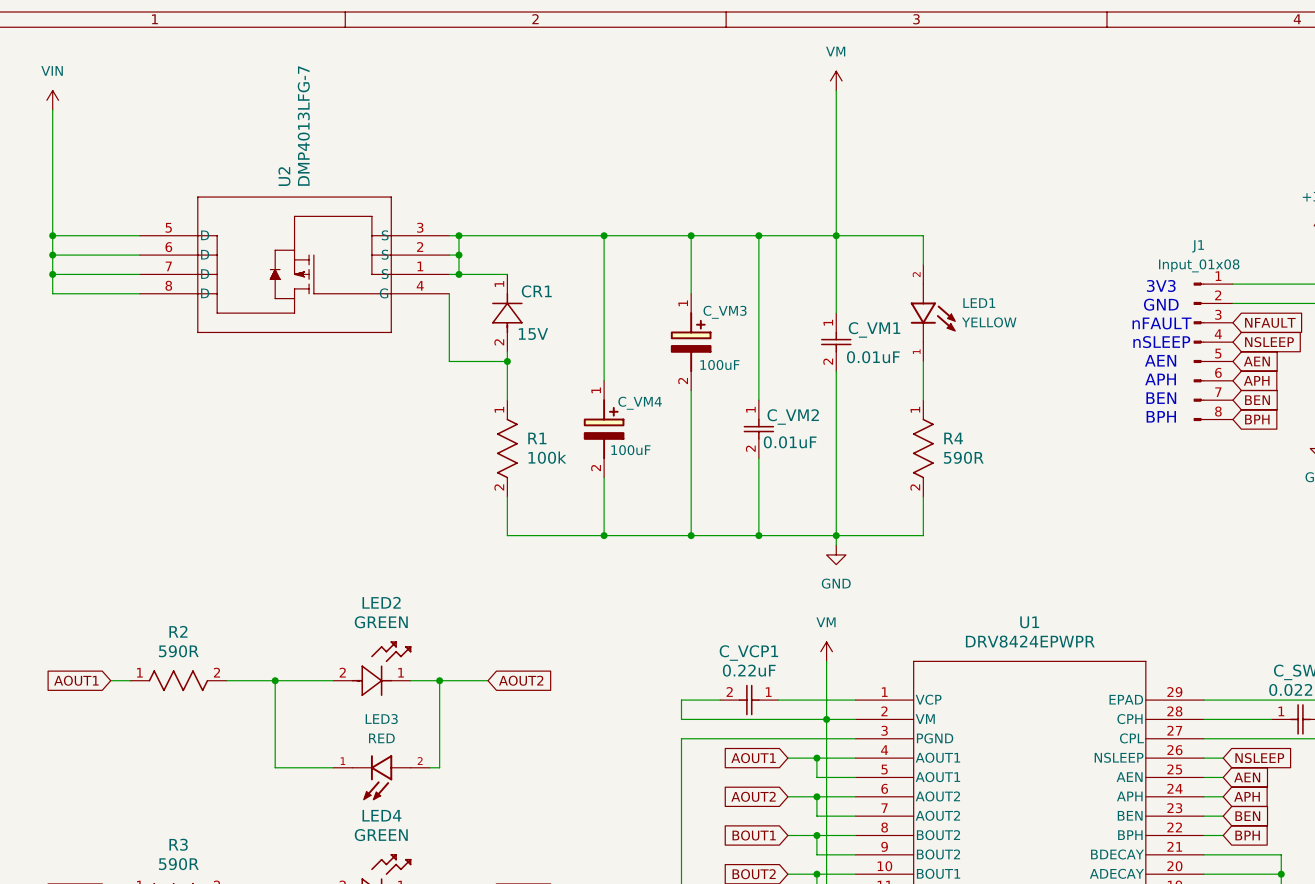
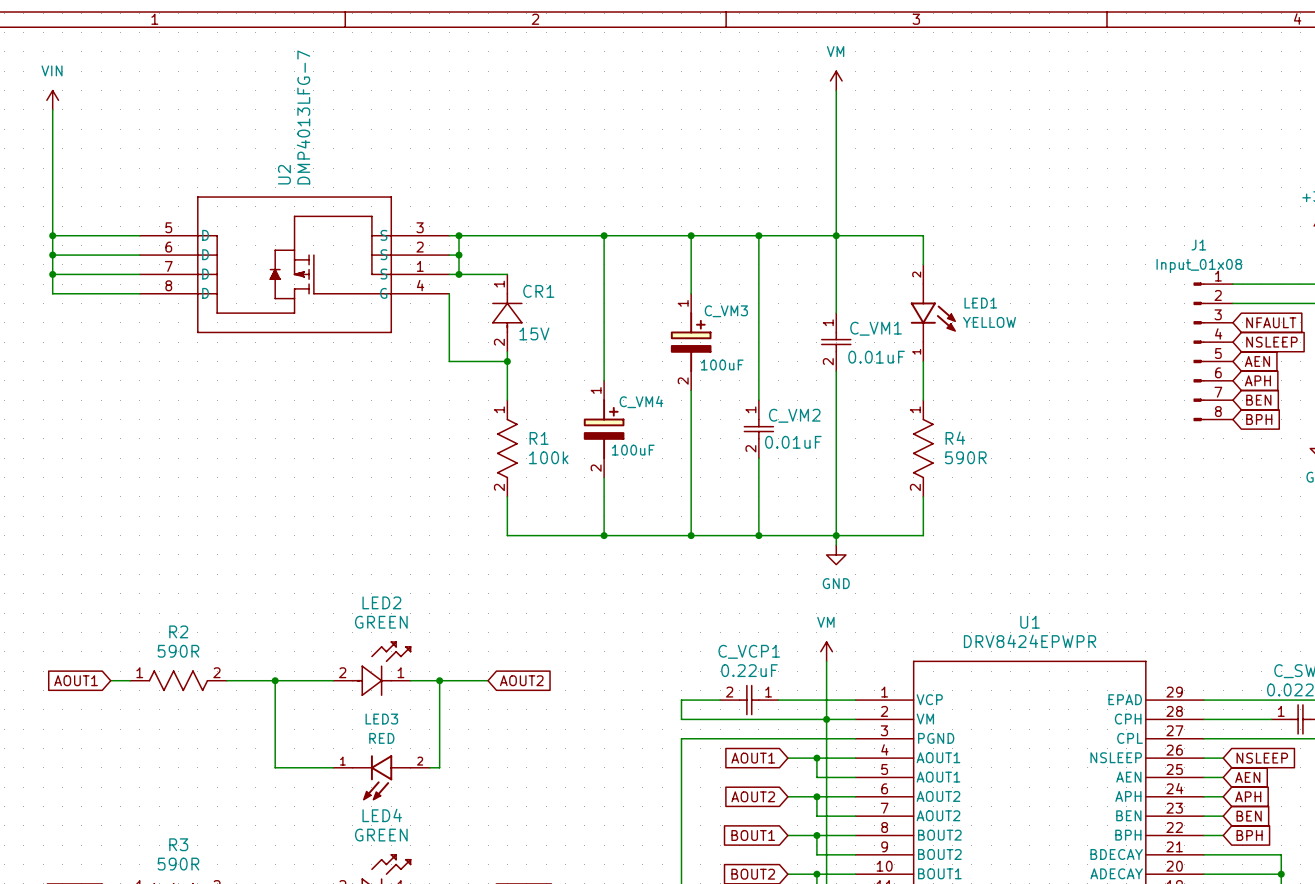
text: 3V3 (1161, 286) -> none
text: GND (1161, 304) -> none
text: nFAULT (1162, 323) -> none
text: nSLEEP (1161, 342) -> none
text: AEN (1160, 360) -> none
text: APH (1160, 379) -> none
text: BEN (1161, 398) -> none
text: BPH (1161, 416) -> none

